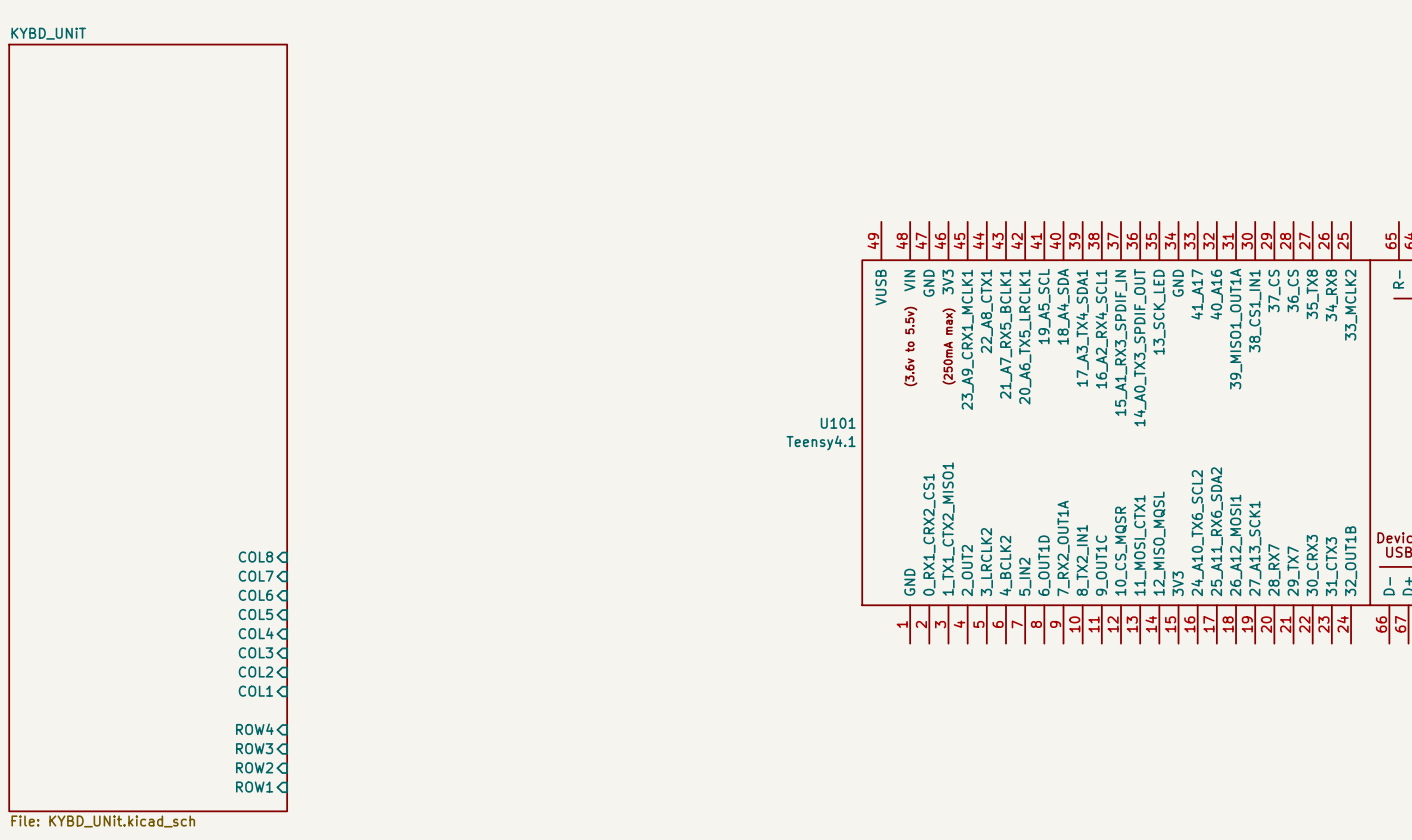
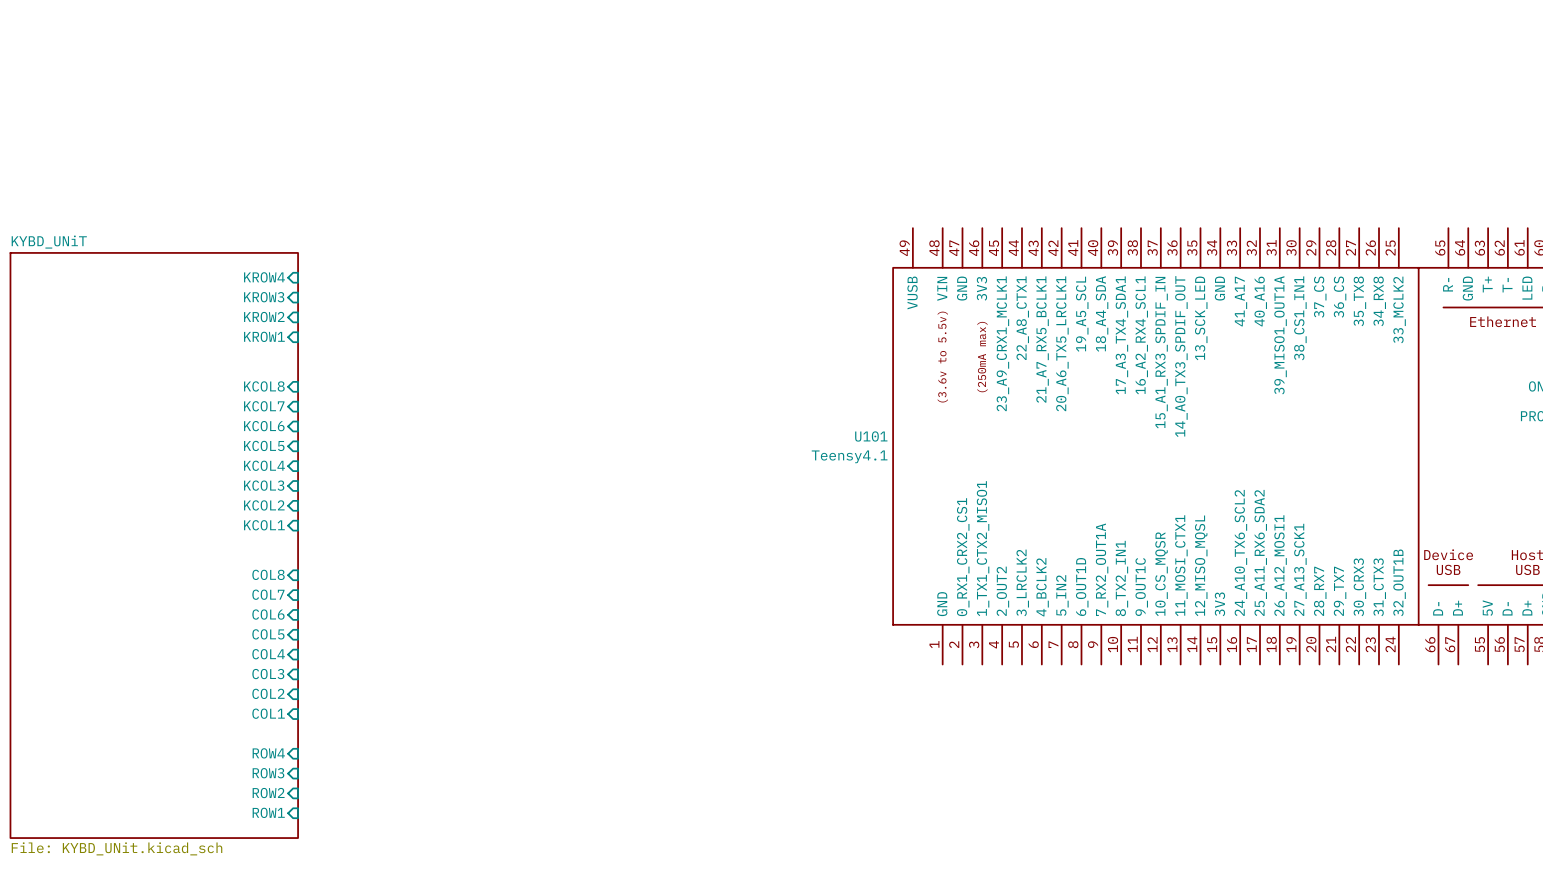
sheet pin: none -> KROW4 (264, 277)
sheet pin: none -> KROW3 (264, 297)
sheet pin: none -> KROW2 (264, 317)
sheet pin: none -> KROW1 (264, 336)
sheet pin: none -> KCOL8 (264, 386)
sheet pin: none -> KCOL7 (264, 406)
sheet pin: none -> KCOL6 (264, 426)
sheet KYBD_UNiT: File: KYBD_UNit.kicad_sch (148, 427) -> none
sheet pin: none -> KCOL5 (264, 445)
sheet pin: none -> KCOL4 (264, 465)
sheet pin: none -> KCOL3 (264, 485)
sheet pin: none -> KCOL2 (264, 505)
sheet pin: none -> KCOL1 (264, 525)
sheet KYBD_UNiT: none -> File: KYBD_UNit.kicad_sch (154, 545)

